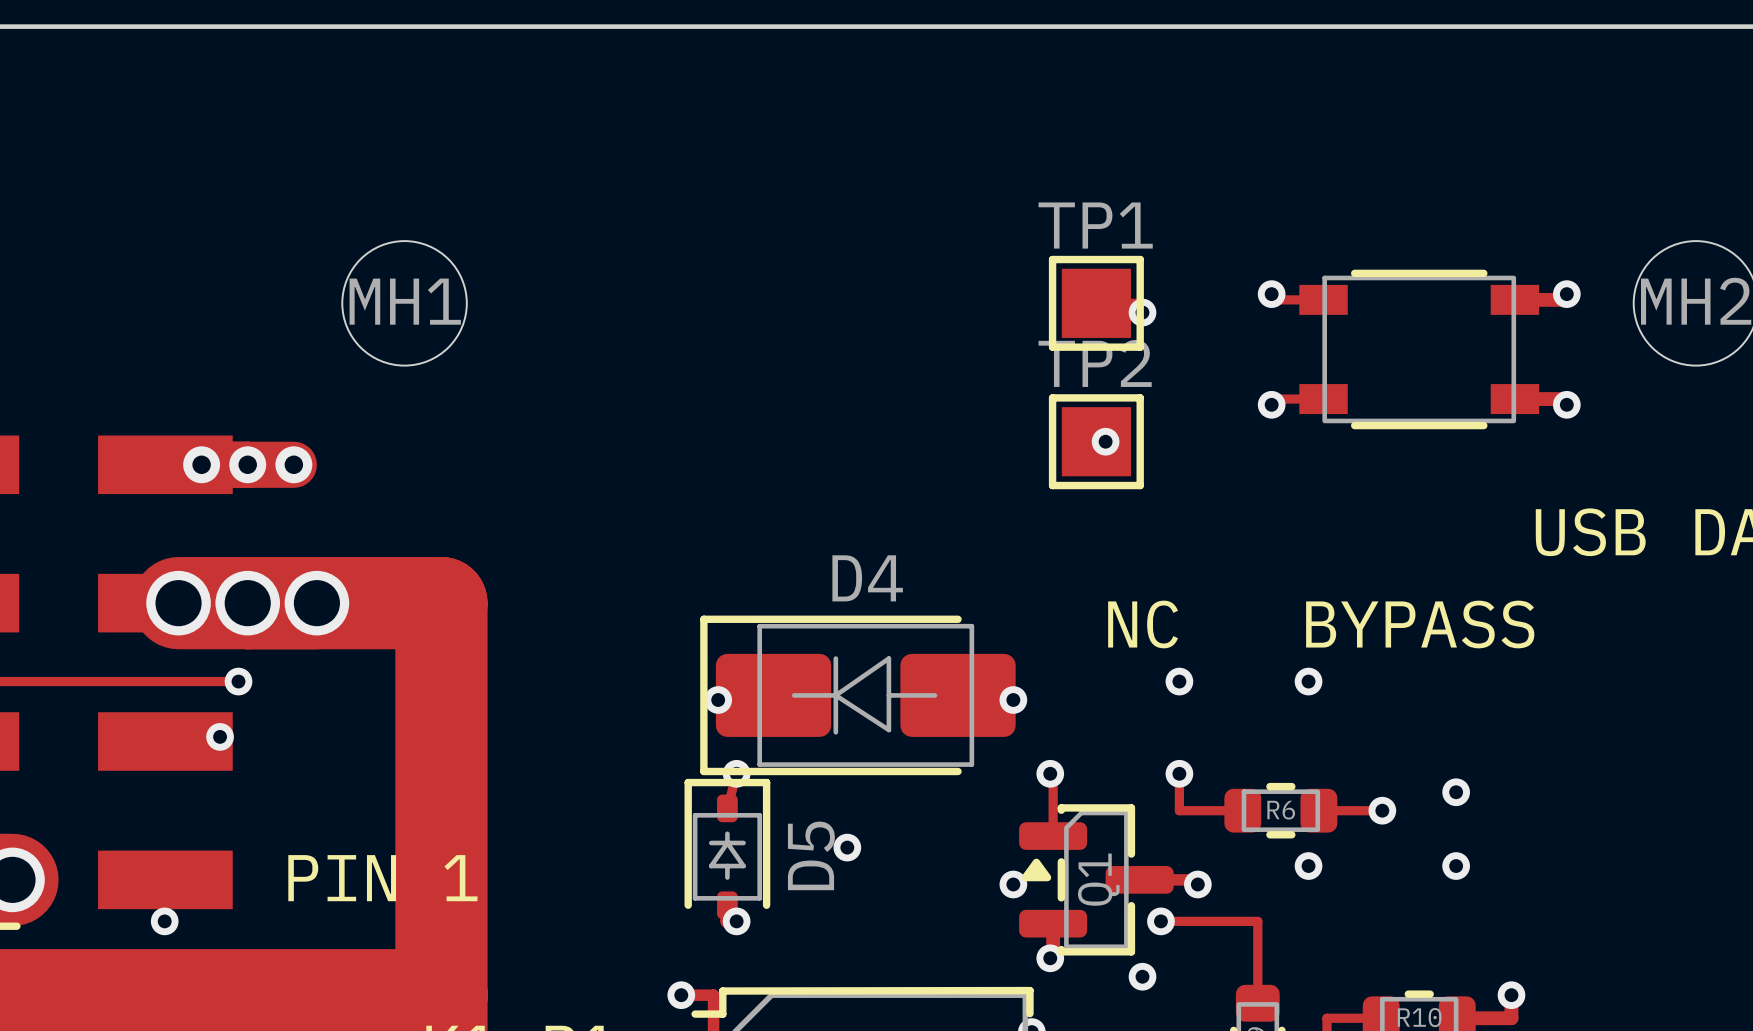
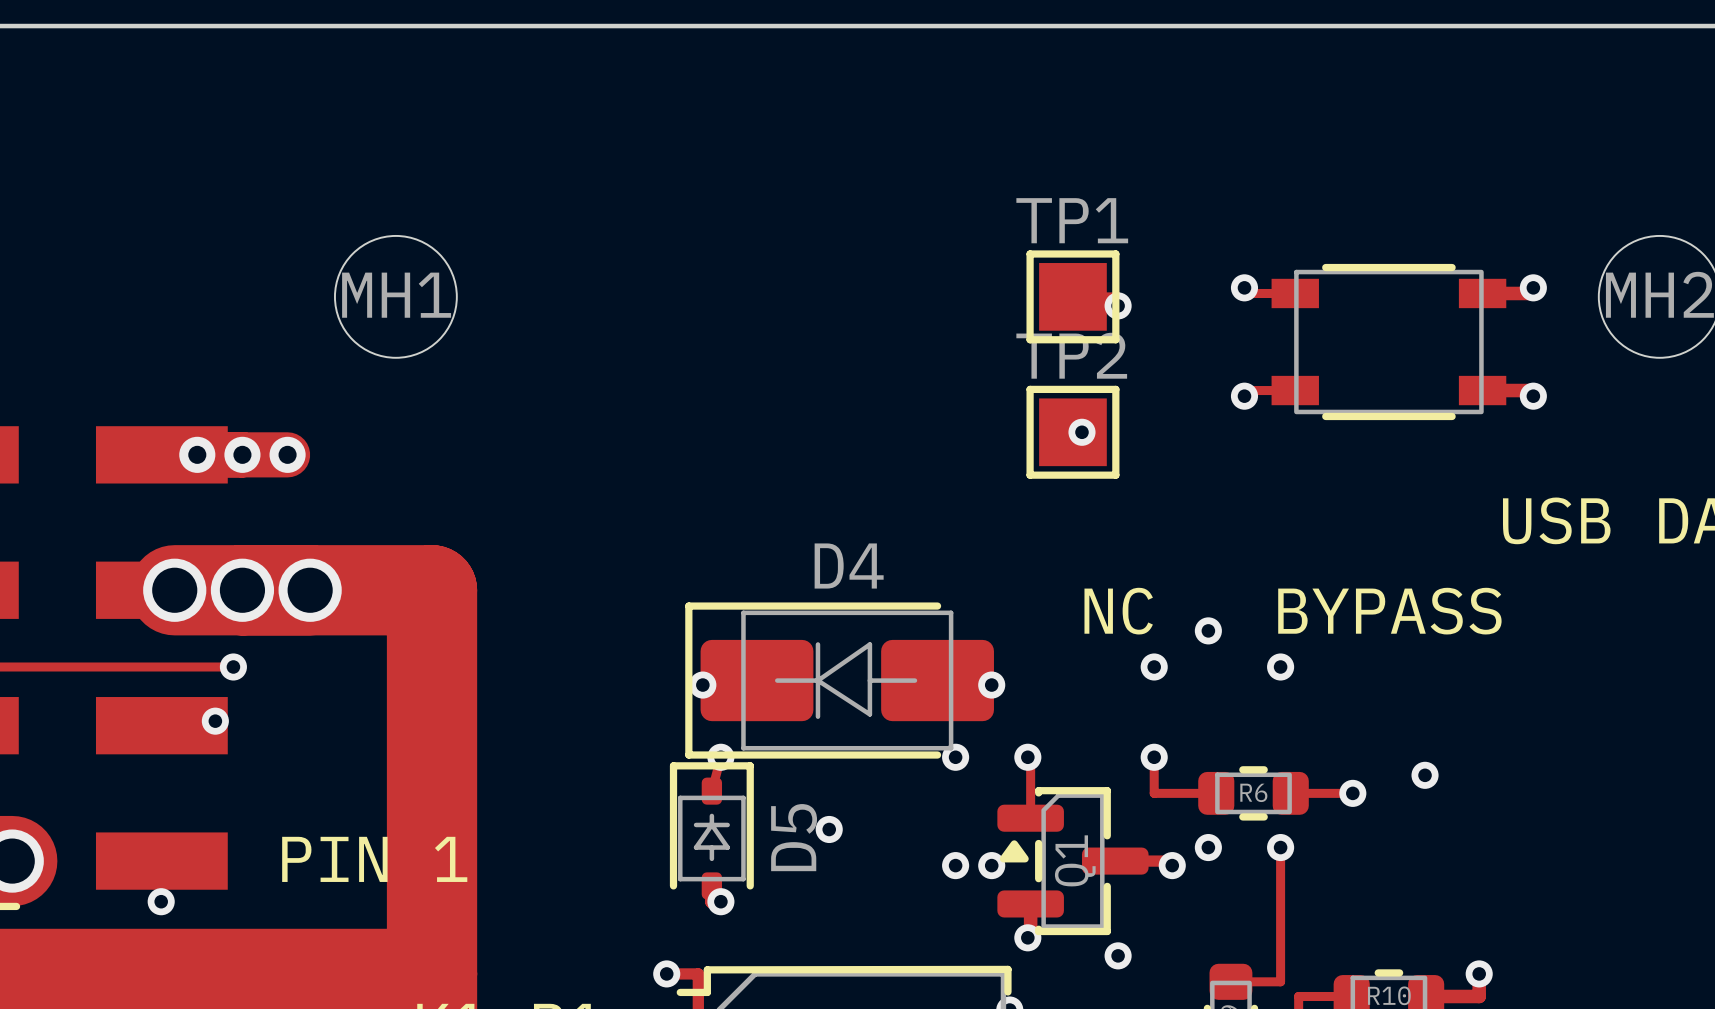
via: none -> (1208, 630)
via: none -> (955, 757)
via: (1456, 866) -> none
via: none -> (955, 865)
track: (1160, 921) (1257, 921) (1257, 1003) -> (1280, 847) (1280, 981) (1230, 981)
via position: (1160, 921) -> (1208, 847)

